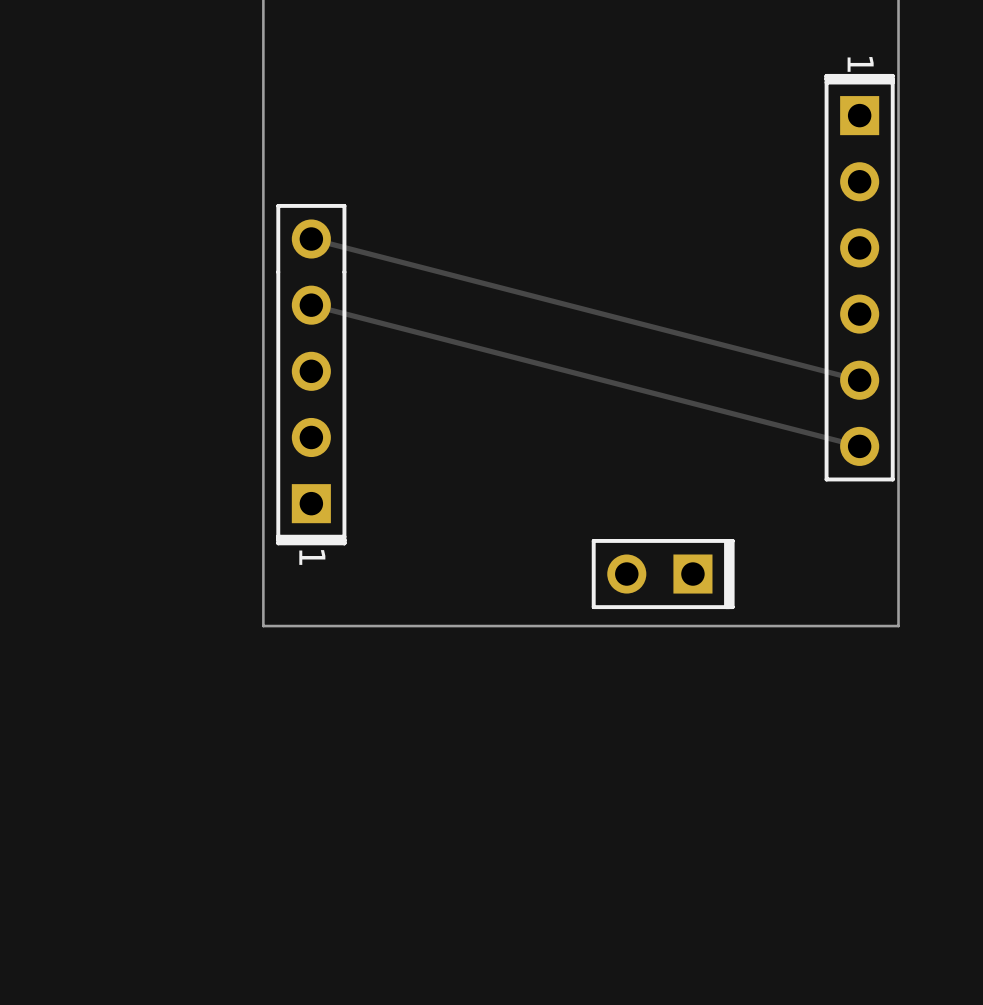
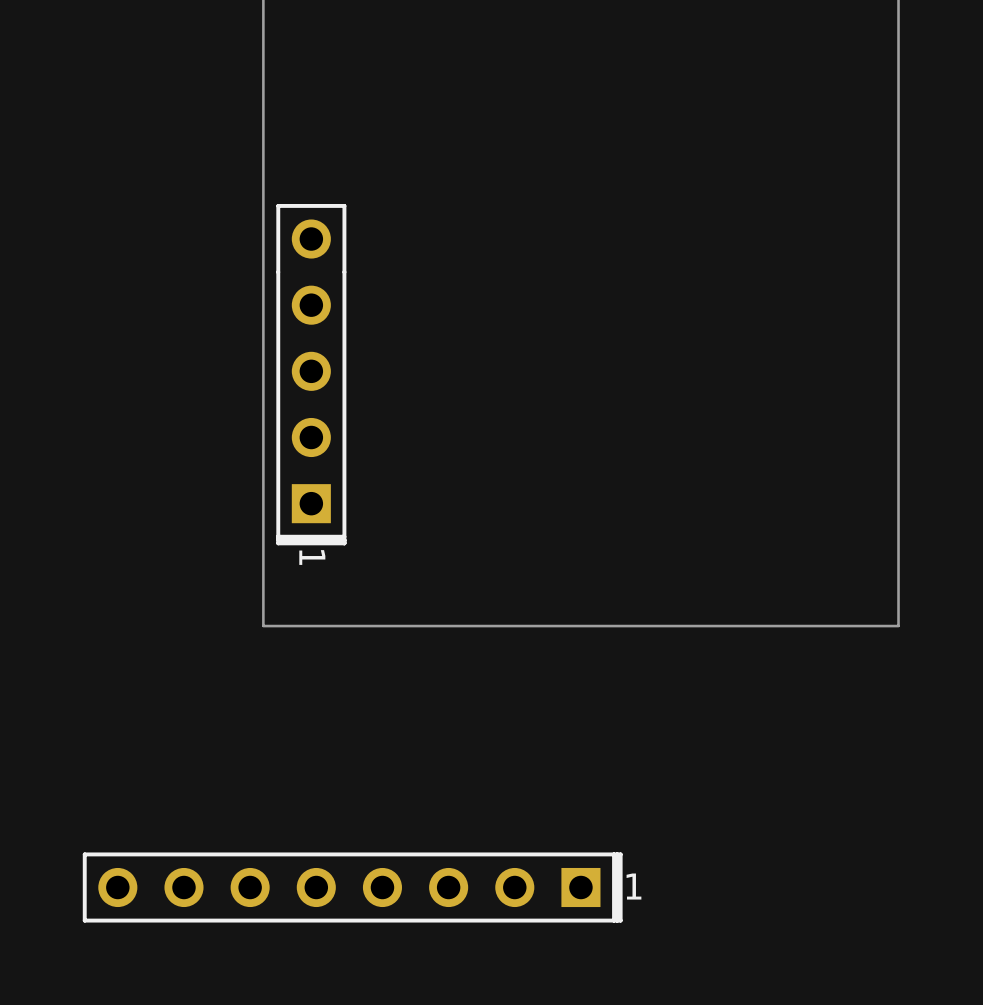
track: (311, 239) (859, 380) -> none
part: (859, 277) -> none
track: (311, 305) (859, 446) -> none
part: (663, 574) -> none
part: none -> (352, 887)

